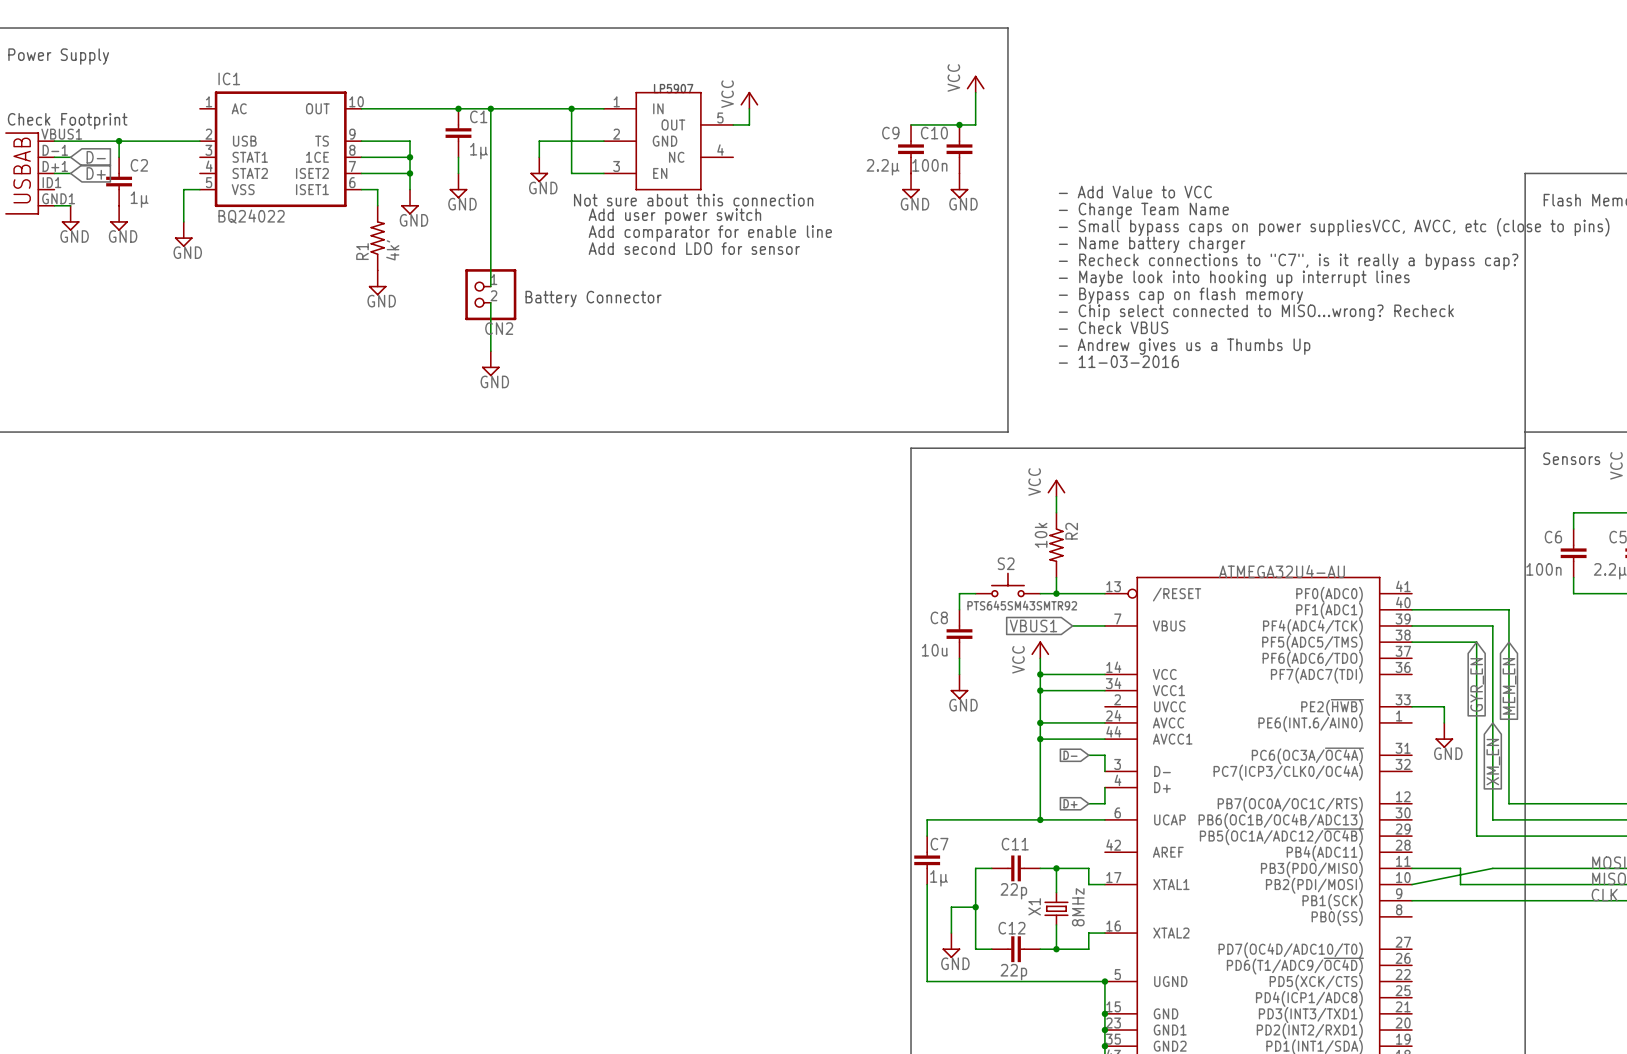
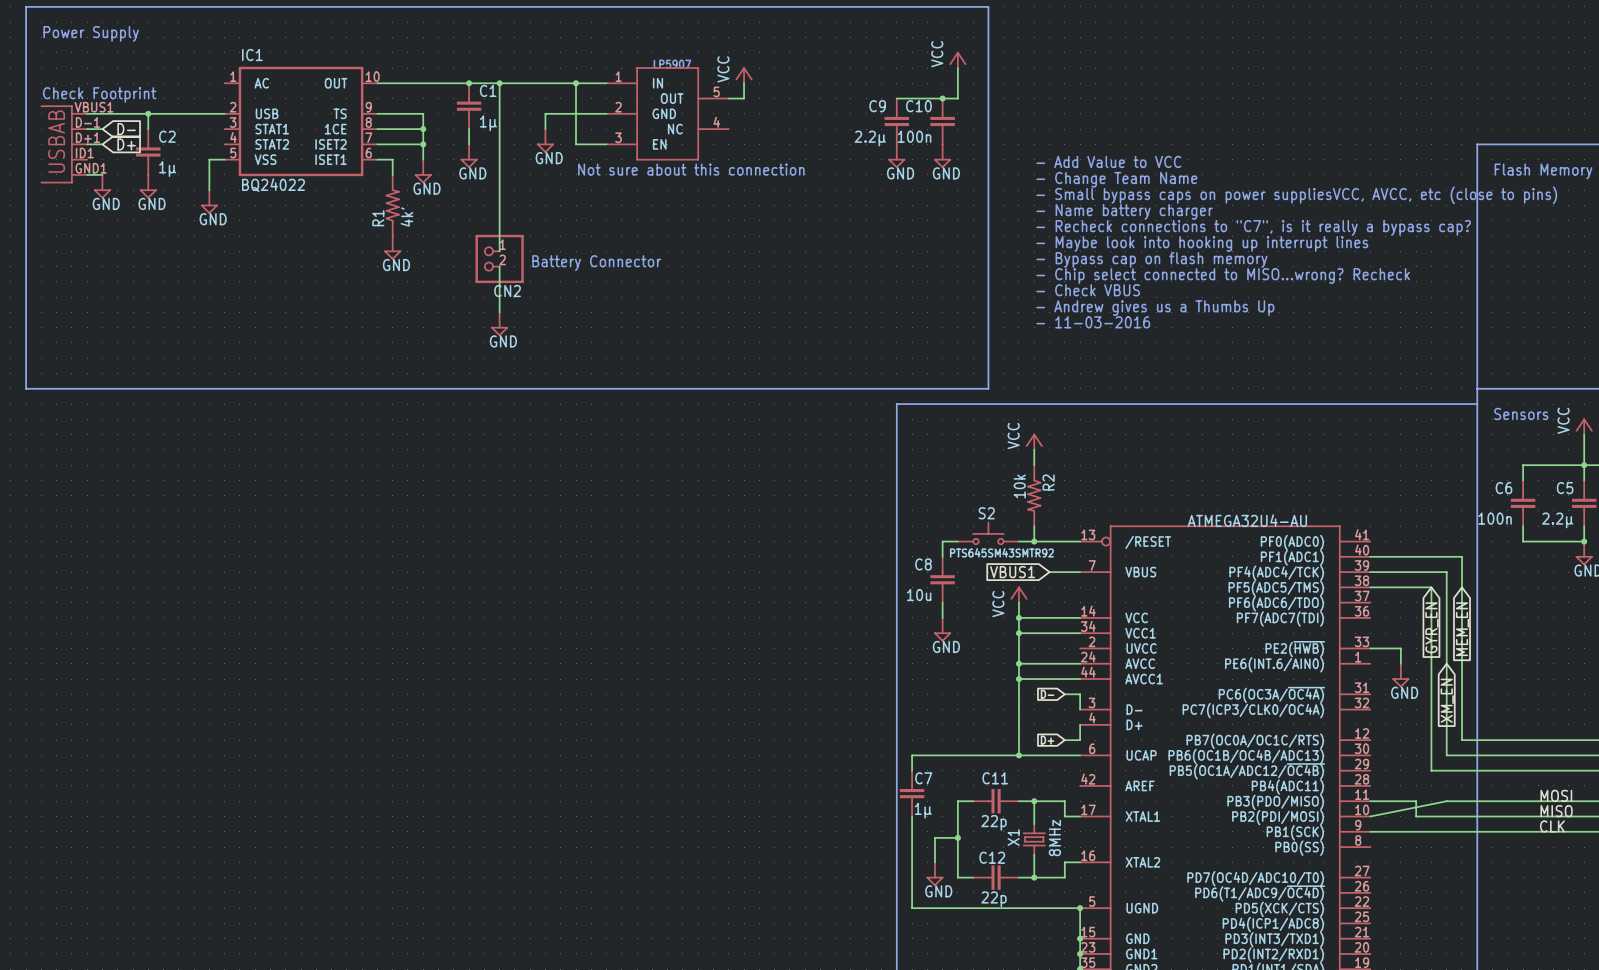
text: Add user power switch (674, 216) -> none
text: Add comparator for enable line (710, 233) -> none
text: Add second LDO for sensor (694, 248) -> none

